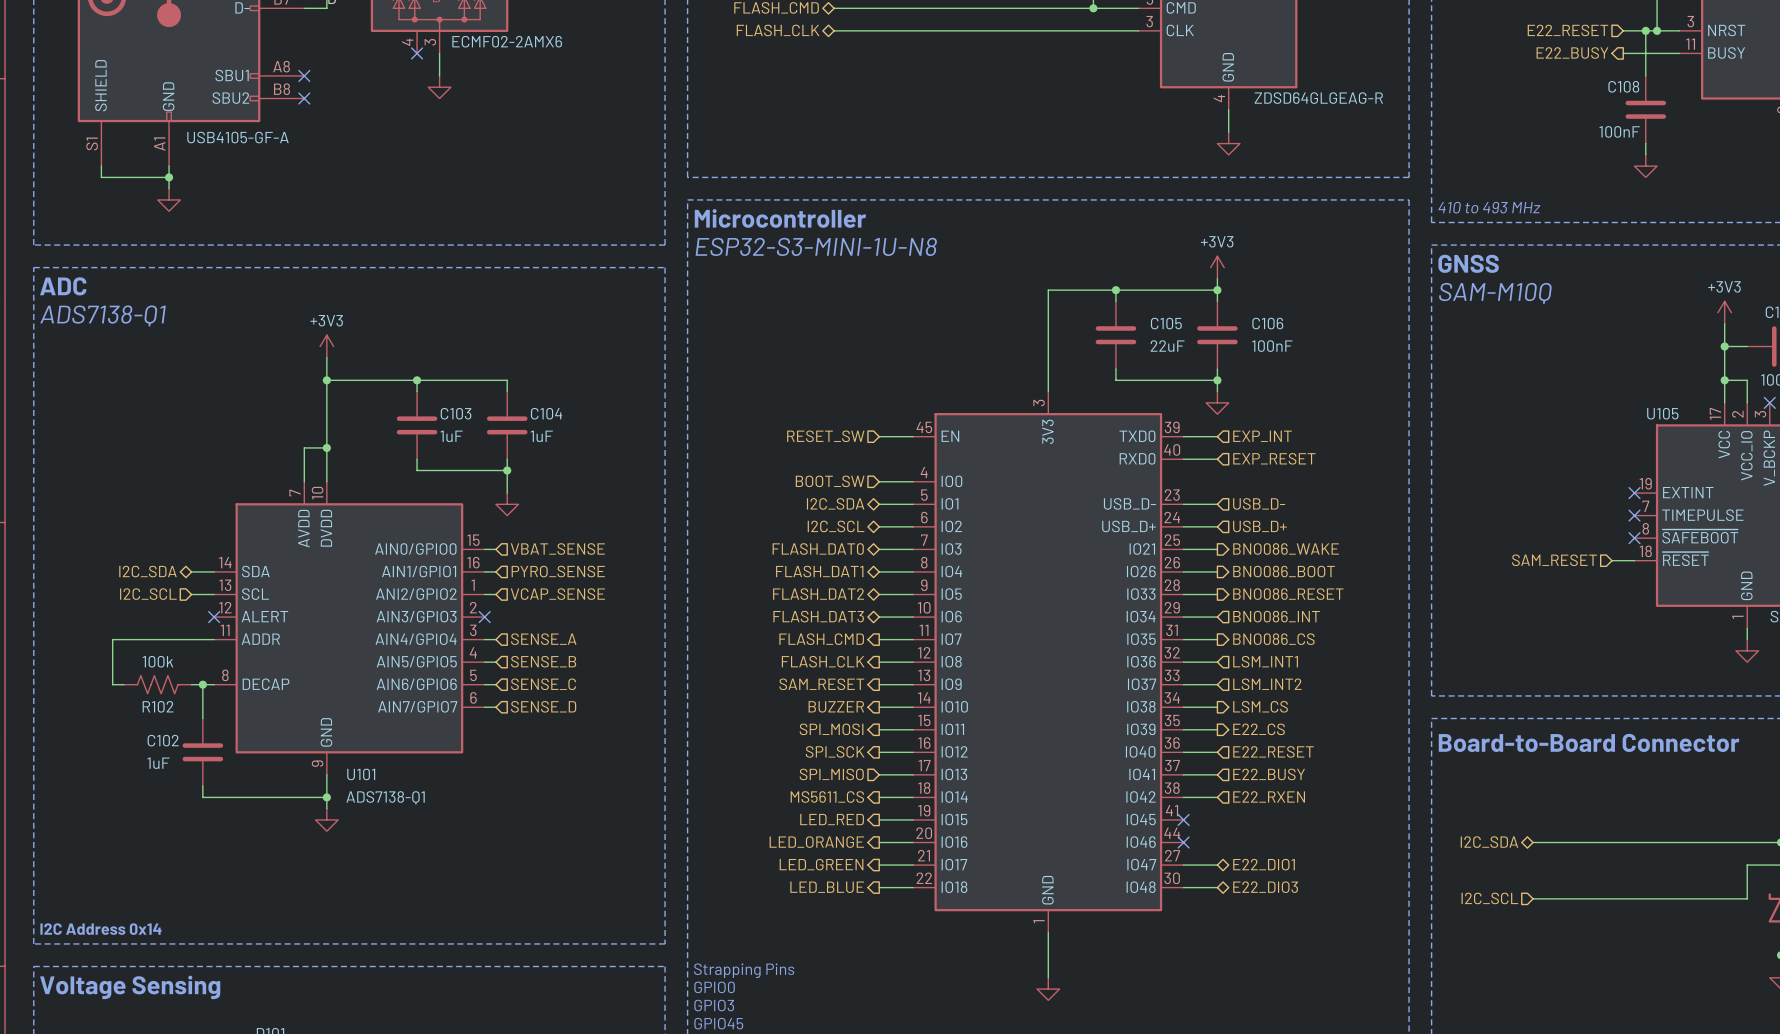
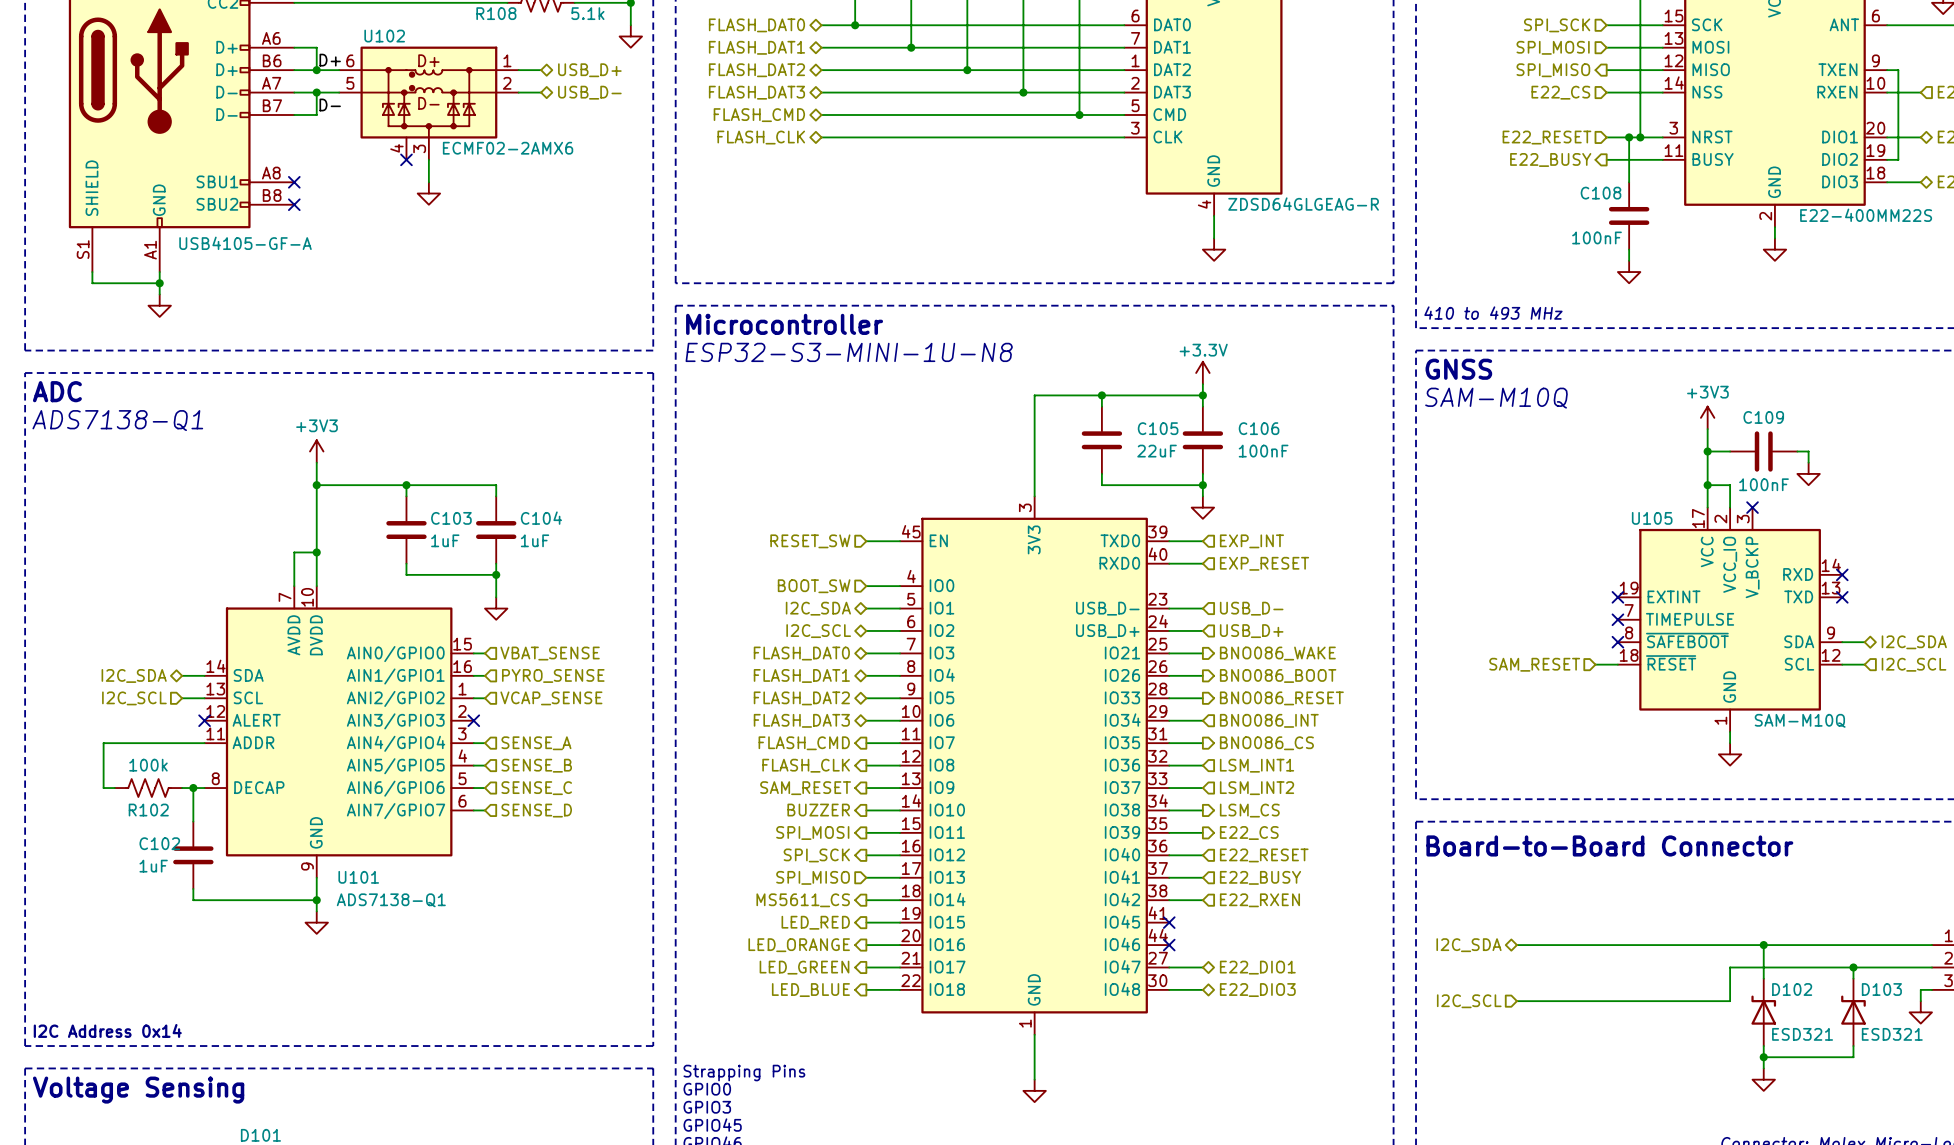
power symbol: +3V3 (1217, 267) -> +3.3V (1202, 372)

